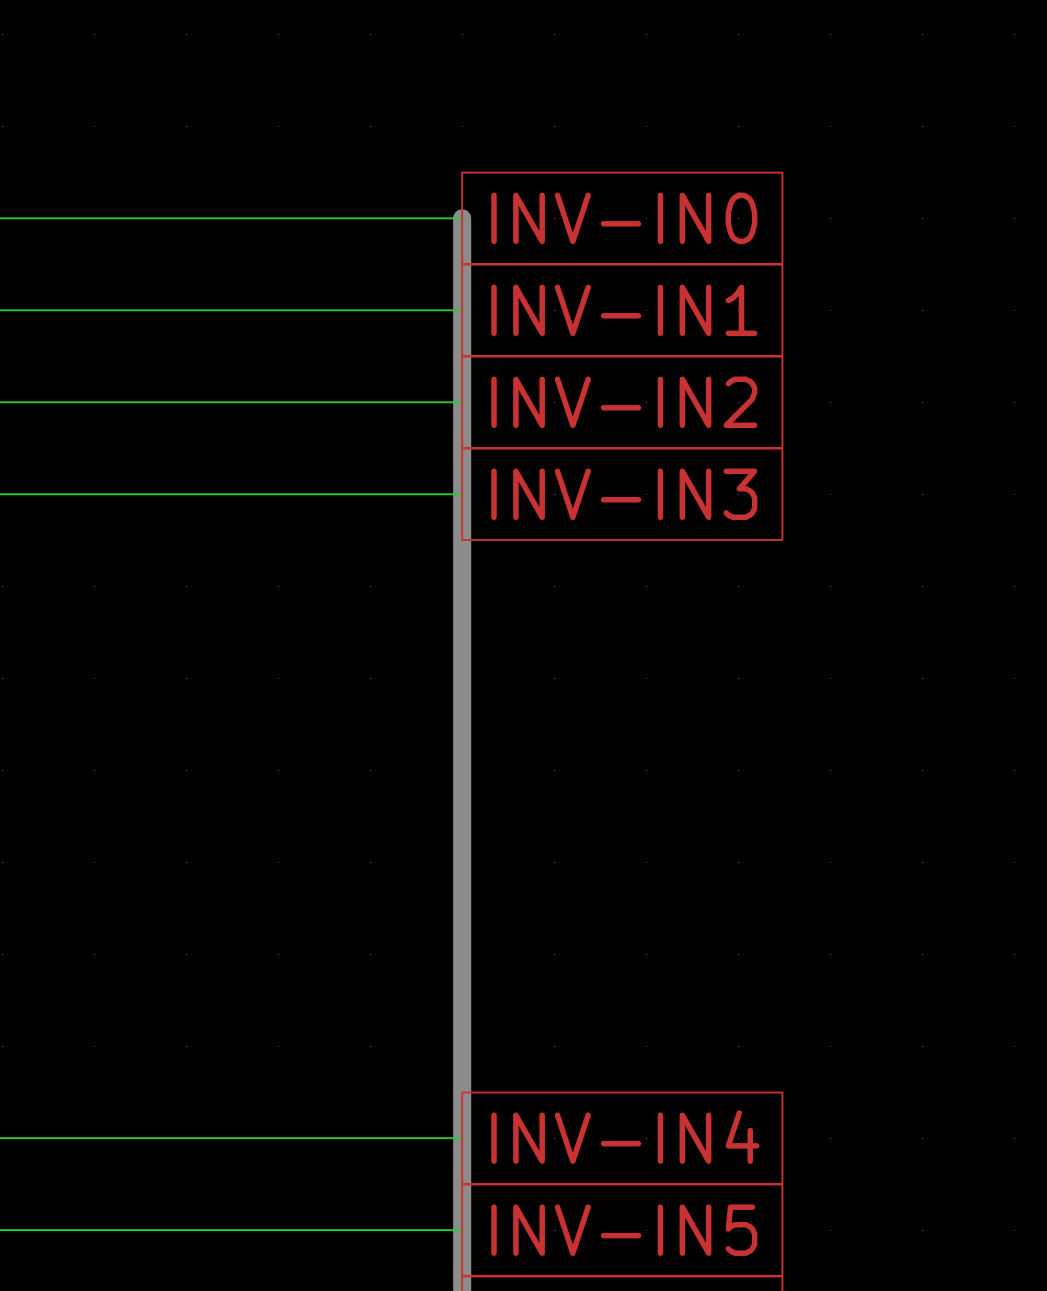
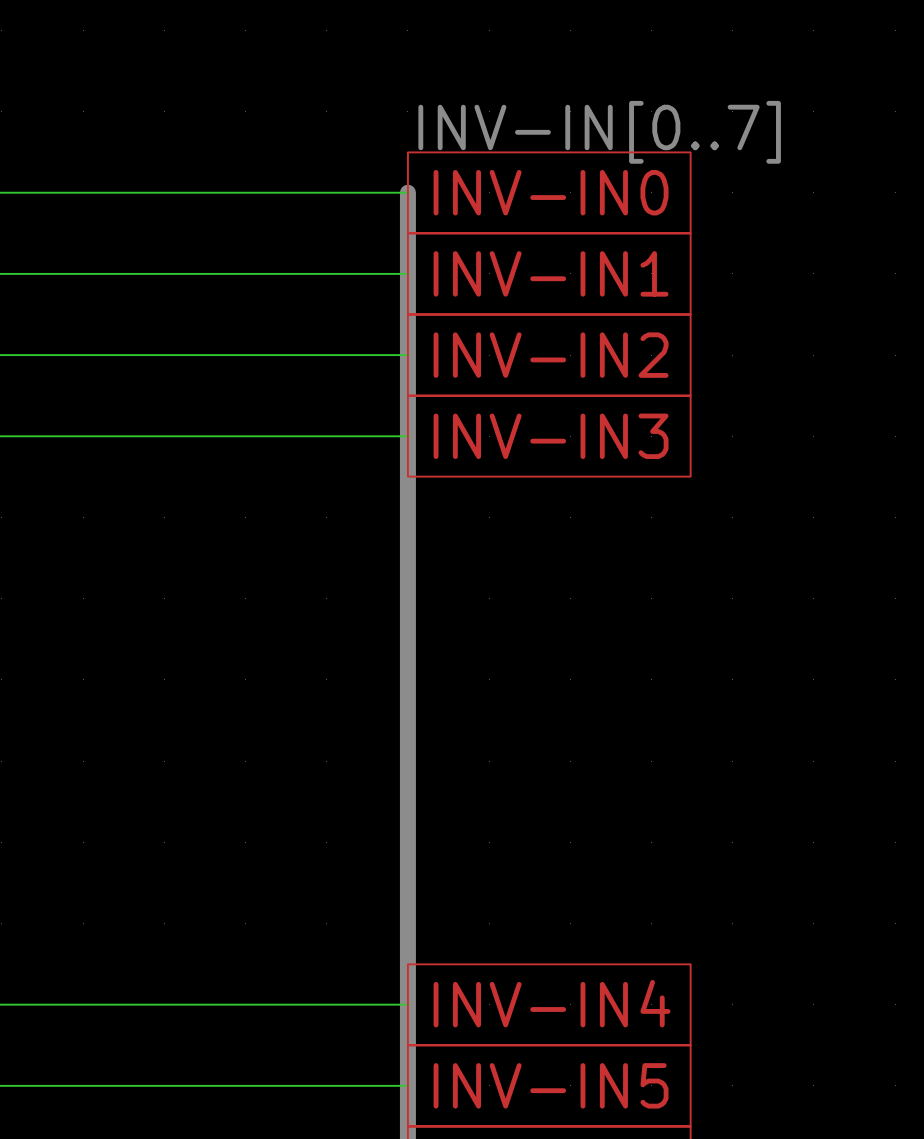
text: none -> INV-IN[0..7] (599, 132)

